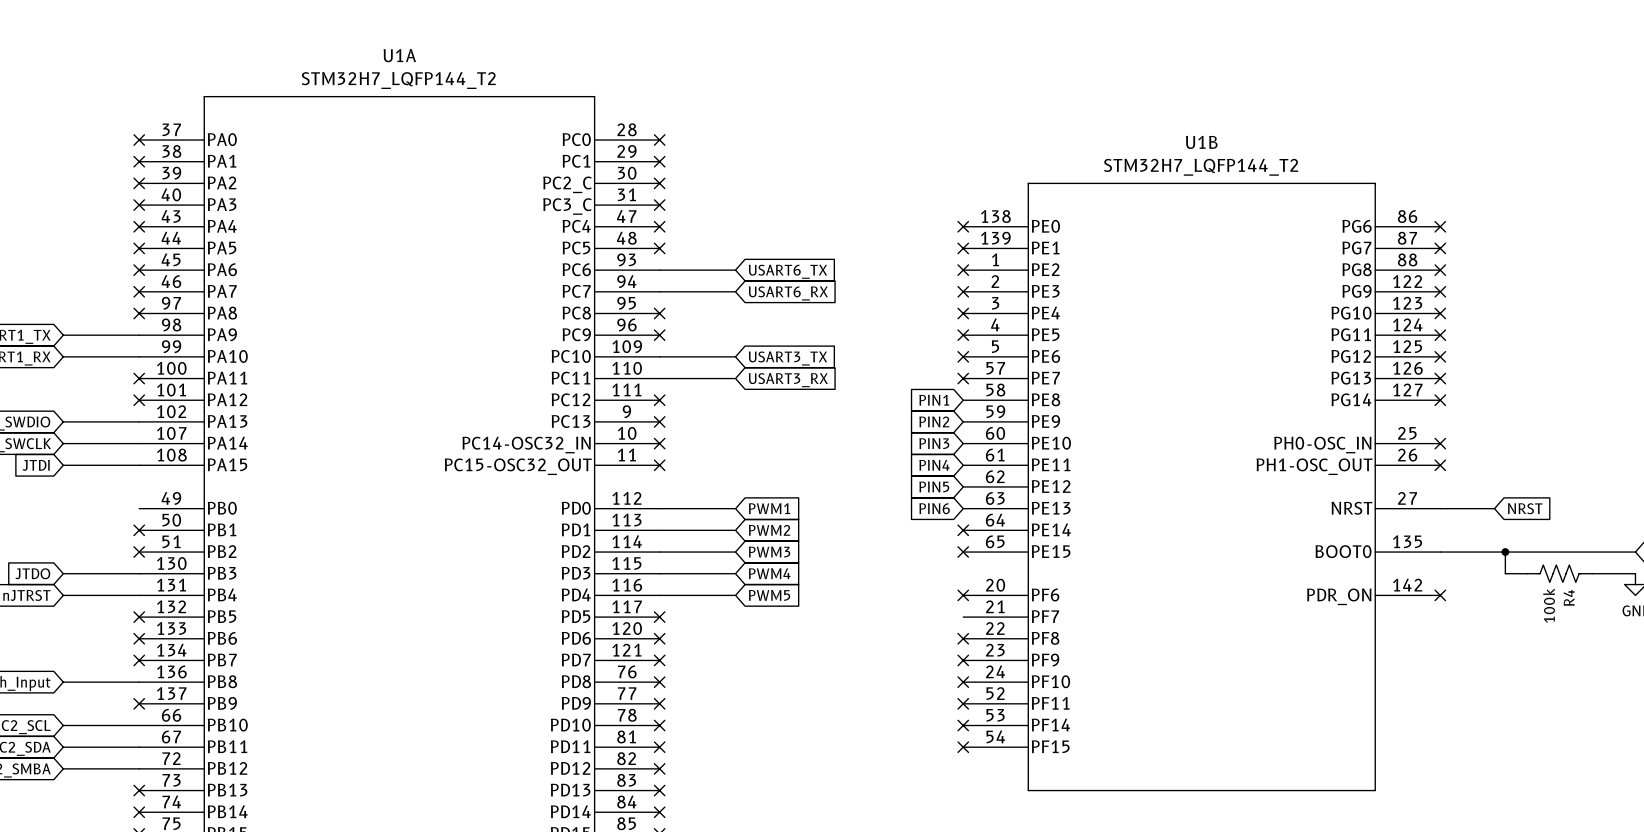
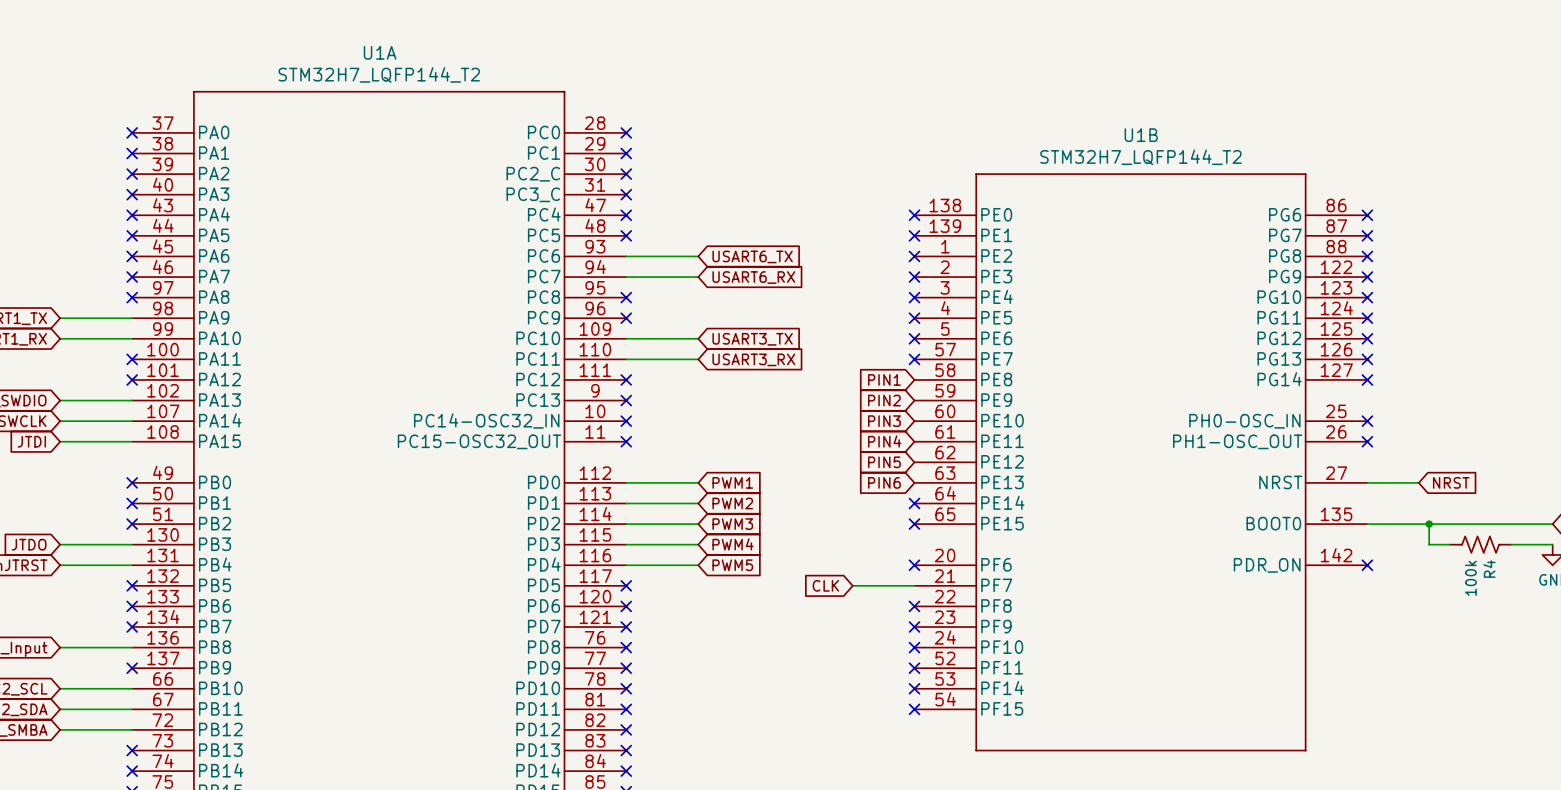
no-connect mark: none -> (132, 482)
global label: none -> CLK (825, 585)
wire: none -> (852, 585) (914, 585)

